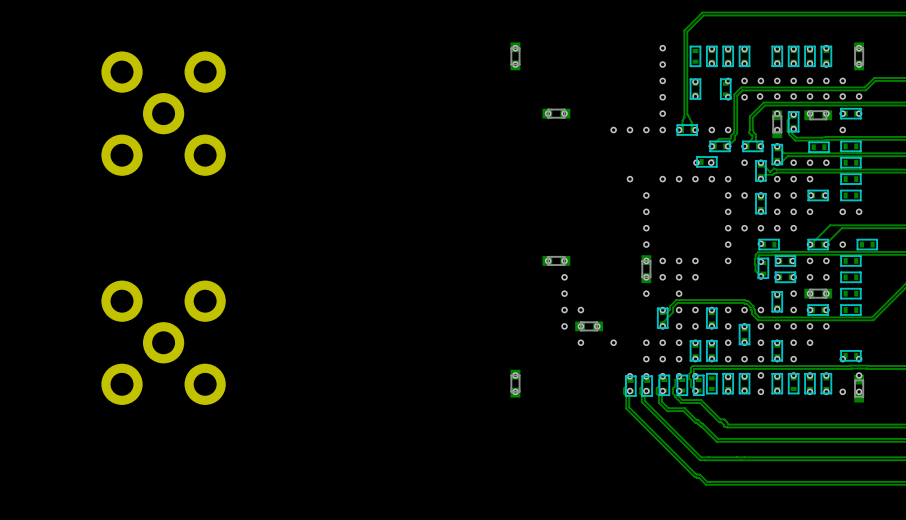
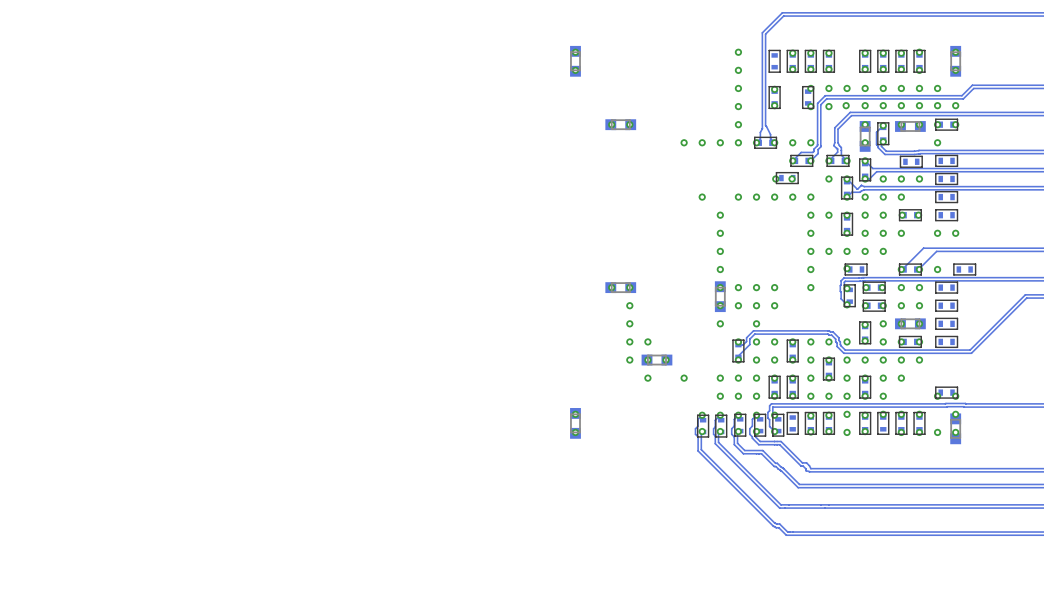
part: (163, 113) -> none
part: (163, 342) -> none

